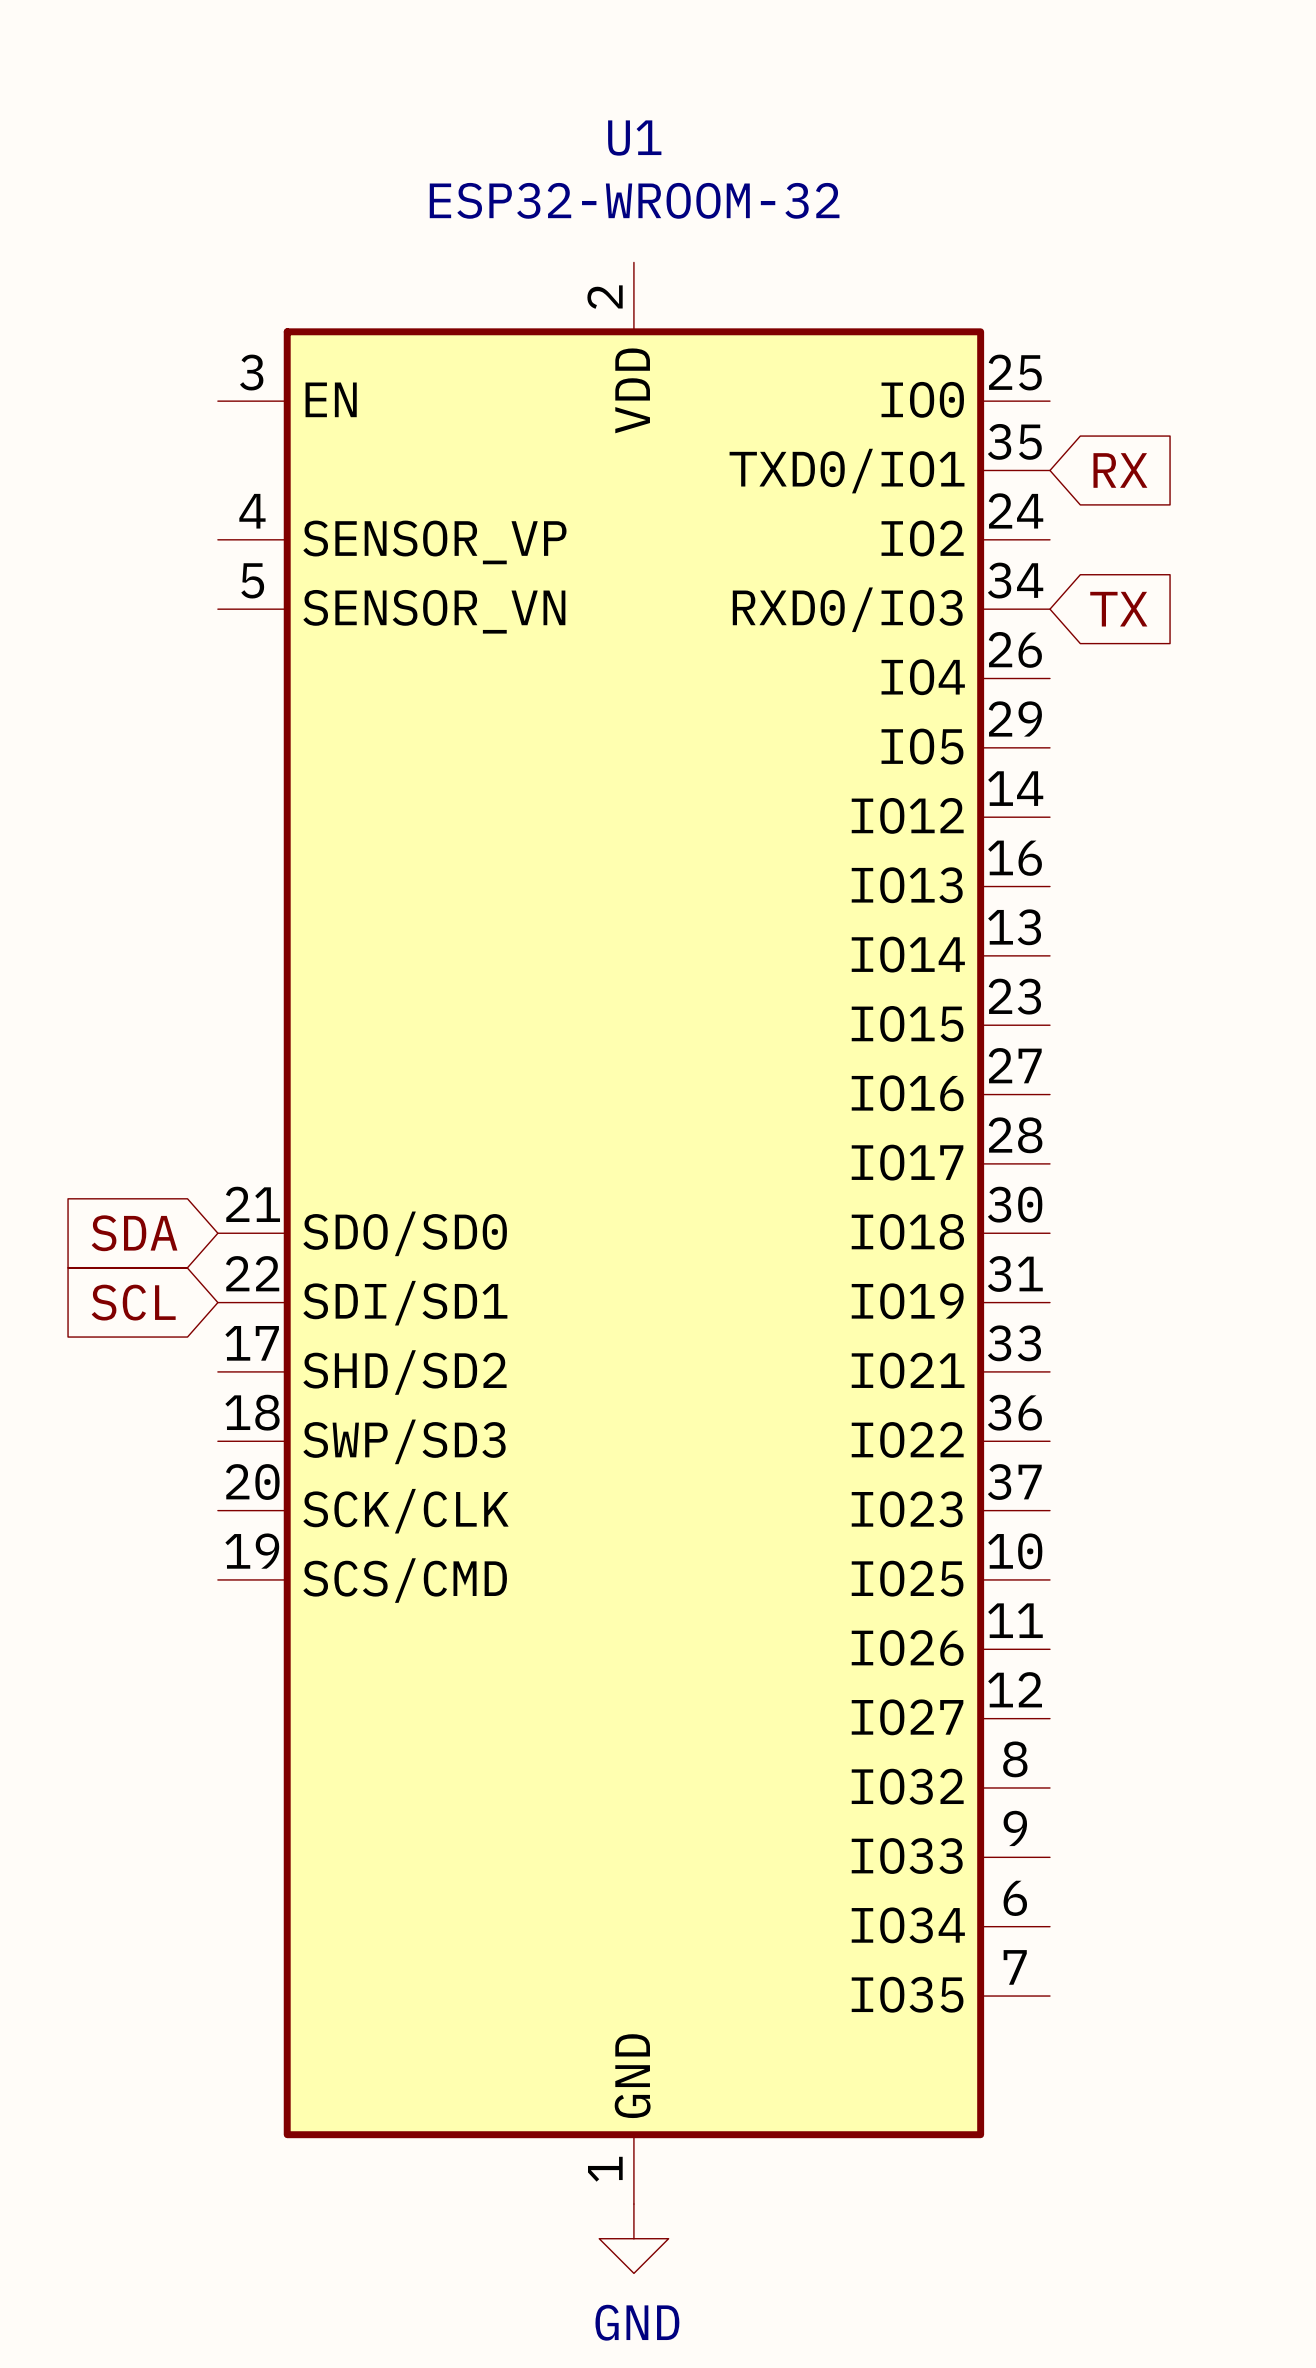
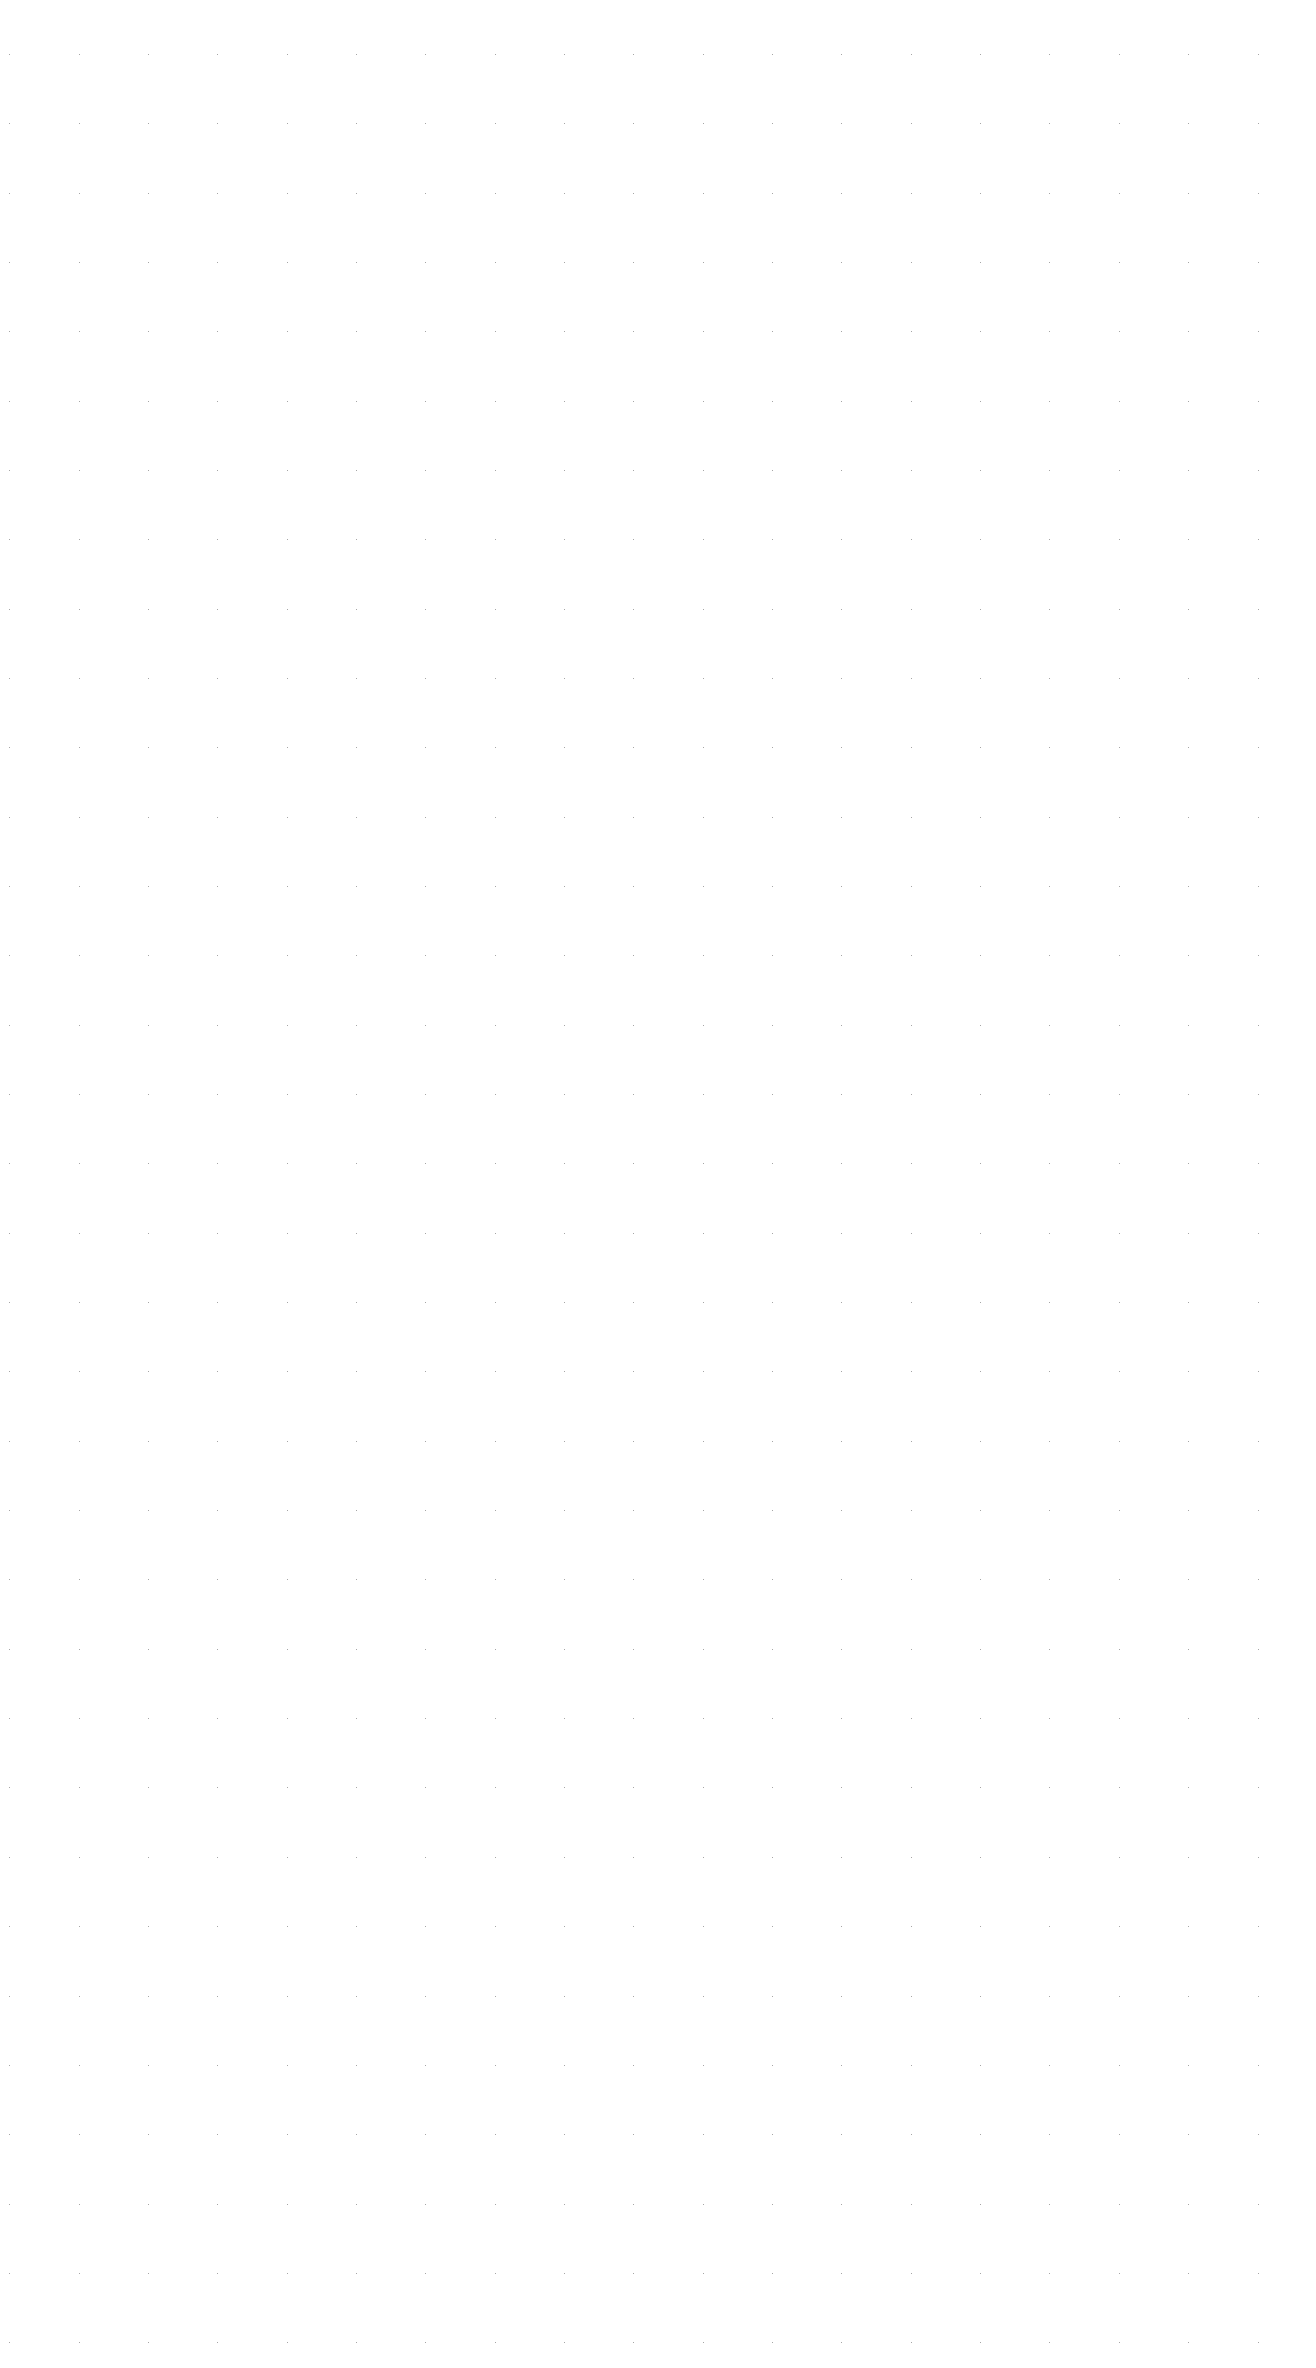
global label: RX (1120, 470) -> none
global label: TX (1118, 609) -> none
global label: SDA (134, 1233) -> none
U1: ESP32-WROOM-32 (633, 1233) -> none
global label: SCL (133, 1302) -> none
power symbol: GND (633, 2238) -> none

